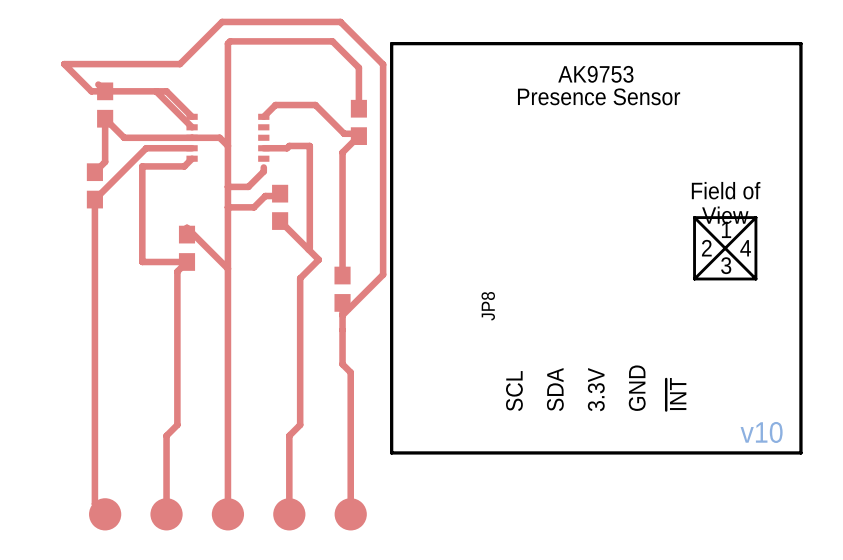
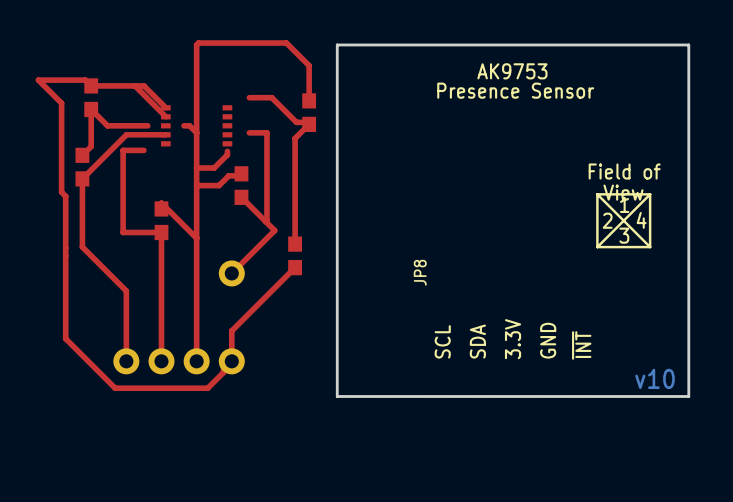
top track: (105, 91) (91, 91) (64, 64) (179, 64) (222, 21) (340, 21) (383, 64) (383, 274) (342, 315) -> none
top track: (289, 105) (275, 105) (263, 116) -> none
top track: (213, 137) (170, 137) -> none
top track: (289, 145) (287, 148) (263, 148) -> none
top track: (192, 158) (184, 166) (166, 166) -> none
top track: (187, 261) (177, 271) (177, 424) (166, 435) (166, 514) -> (161, 232) (161, 361)
top track: (94, 278) (94, 504) (105, 514) -> (82, 247) (126, 291) (126, 361)
top track: (300, 278) (300, 424) (289, 435) (289, 514) -> (258, 246) (231, 273)
top track: (342, 302) (342, 364) (350, 372) (350, 514) -> (295, 267) (231, 330) (231, 361) (207, 388) (115, 388) (65, 338) (65, 196) (61, 192) (61, 103) (38, 80) (85, 80)
part: none -> (231, 273)
part: none -> (179, 361)
top track: (227, 412) (227, 514) -> none
part: (105, 514) -> none
part: (166, 514) -> none
part: (227, 514) -> none
part: (289, 514) -> none
part: (350, 514) -> none

